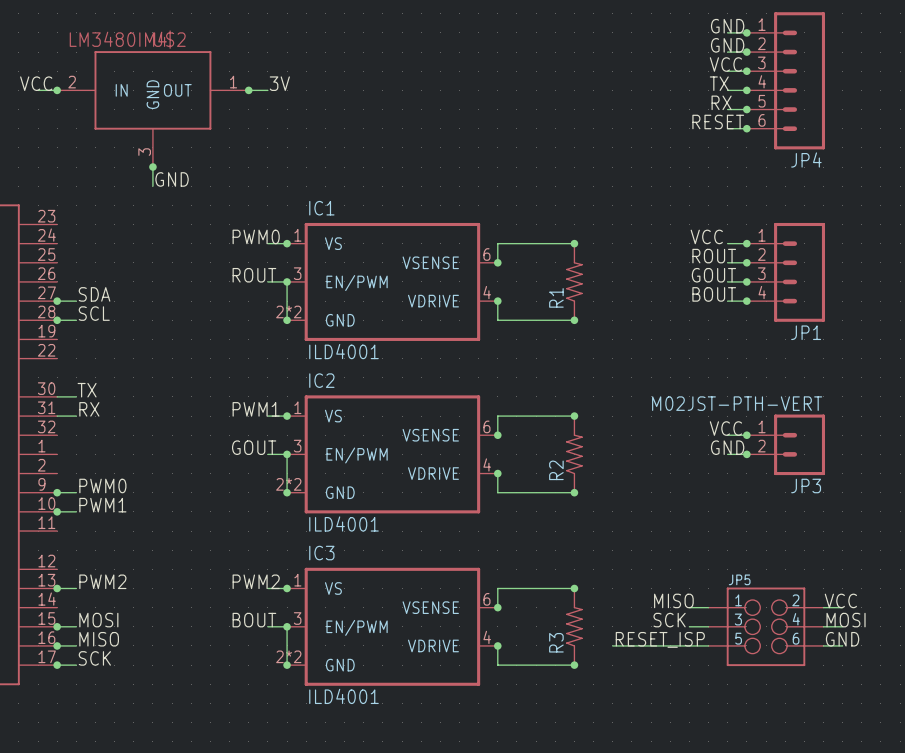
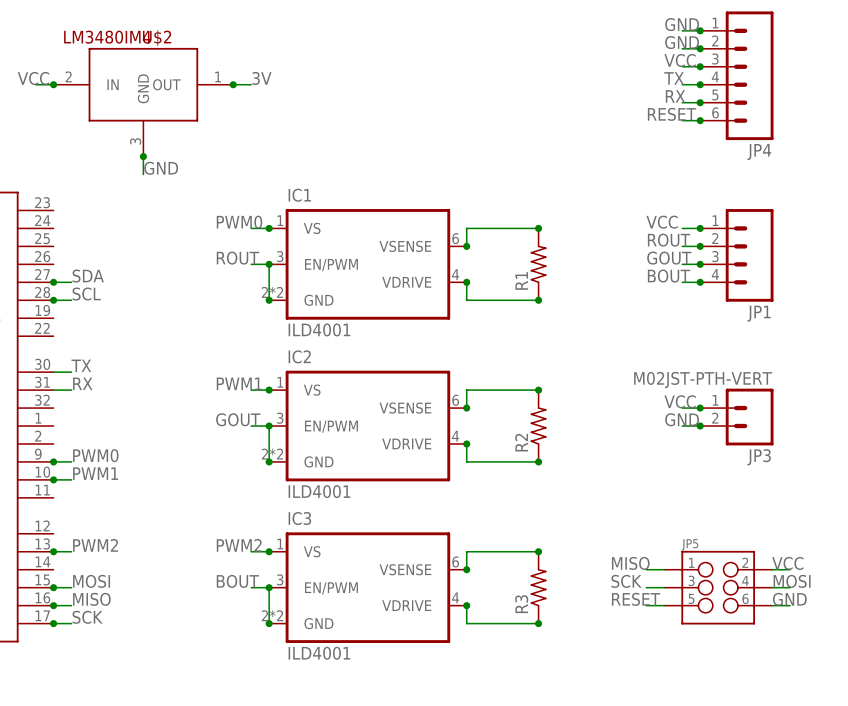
label: RESET_ISP (660, 639) -> RESET (636, 599)
wire: (612, 645) (689, 645) -> none

